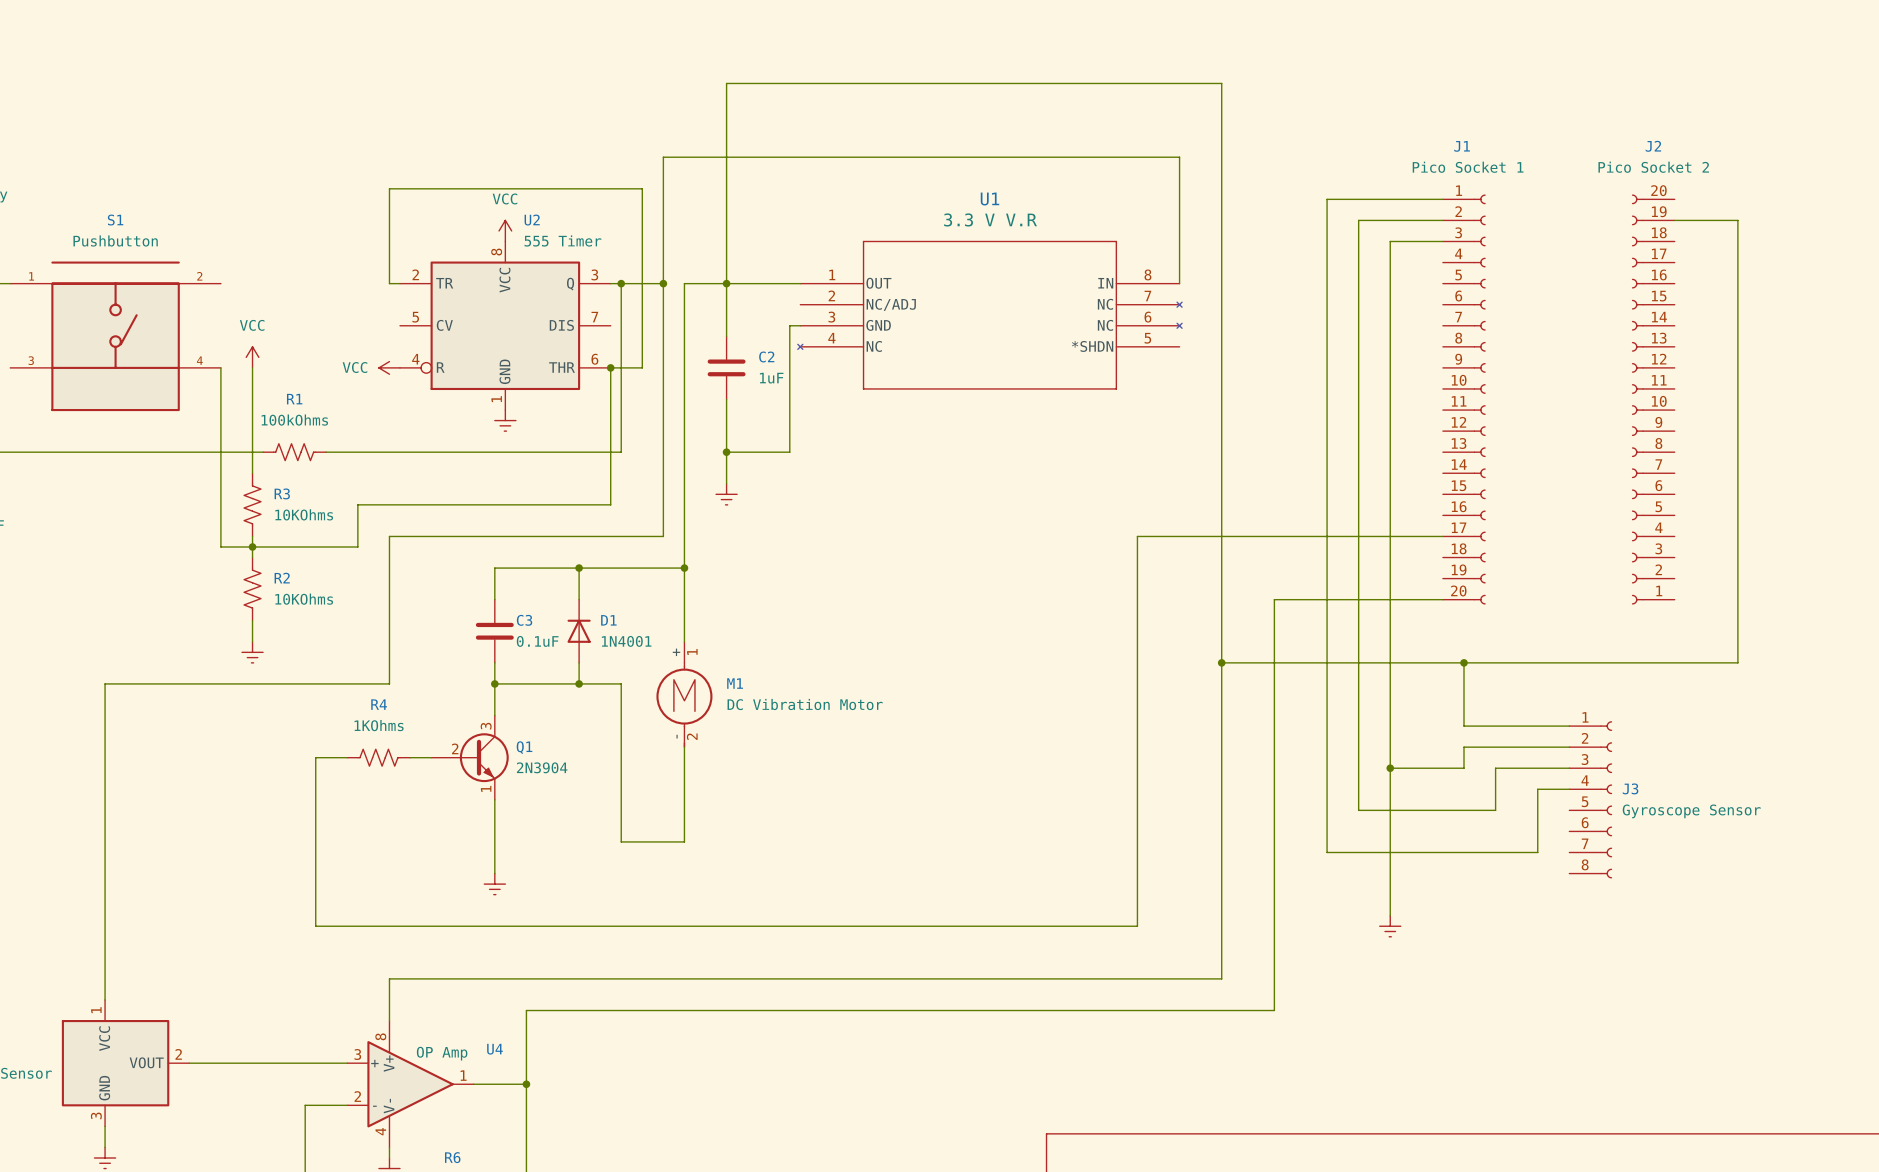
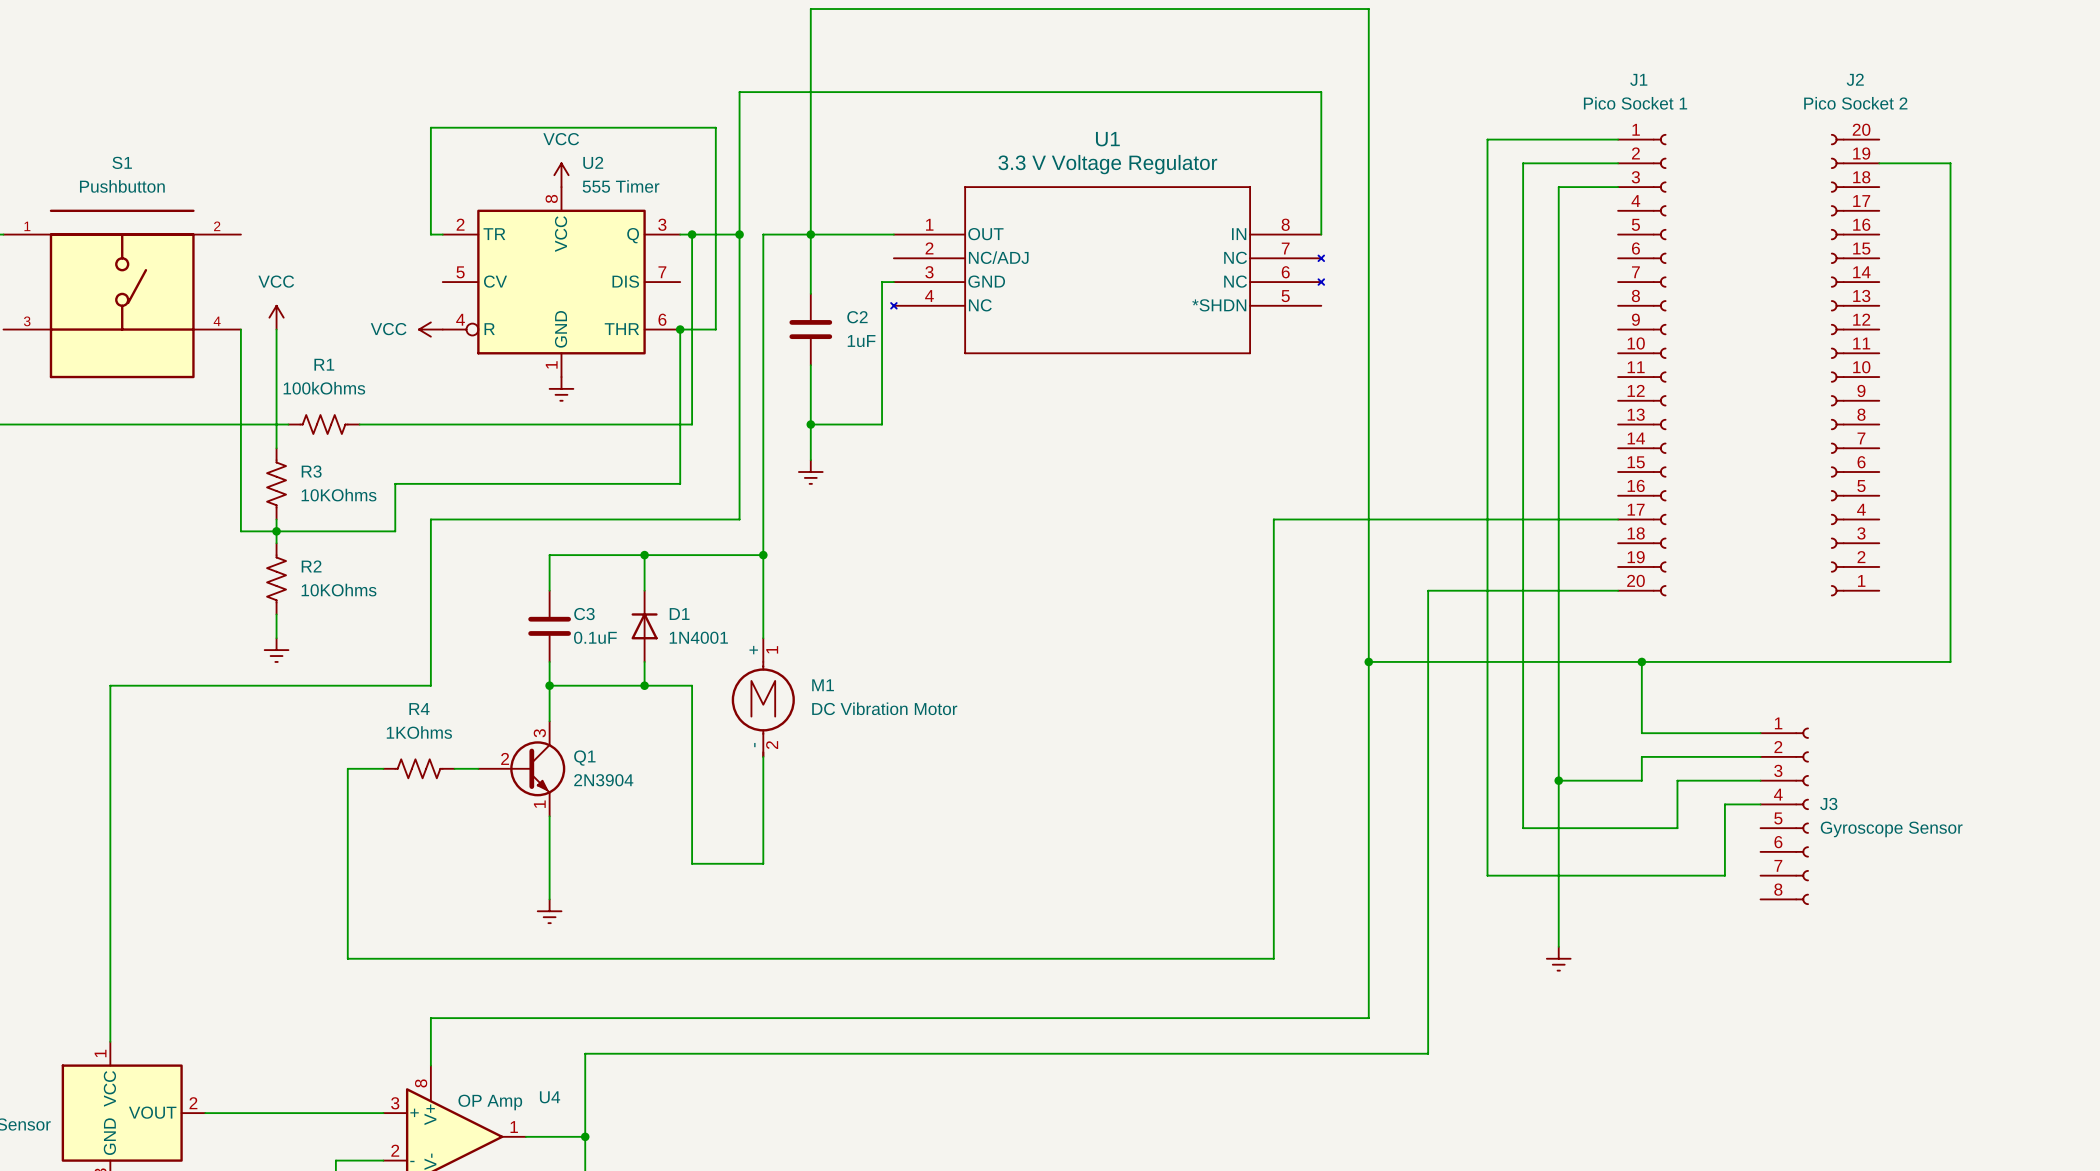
U1 value: 3.3 V V.R (990, 219) -> 3.3 V Voltage Regulator (1107, 164)

